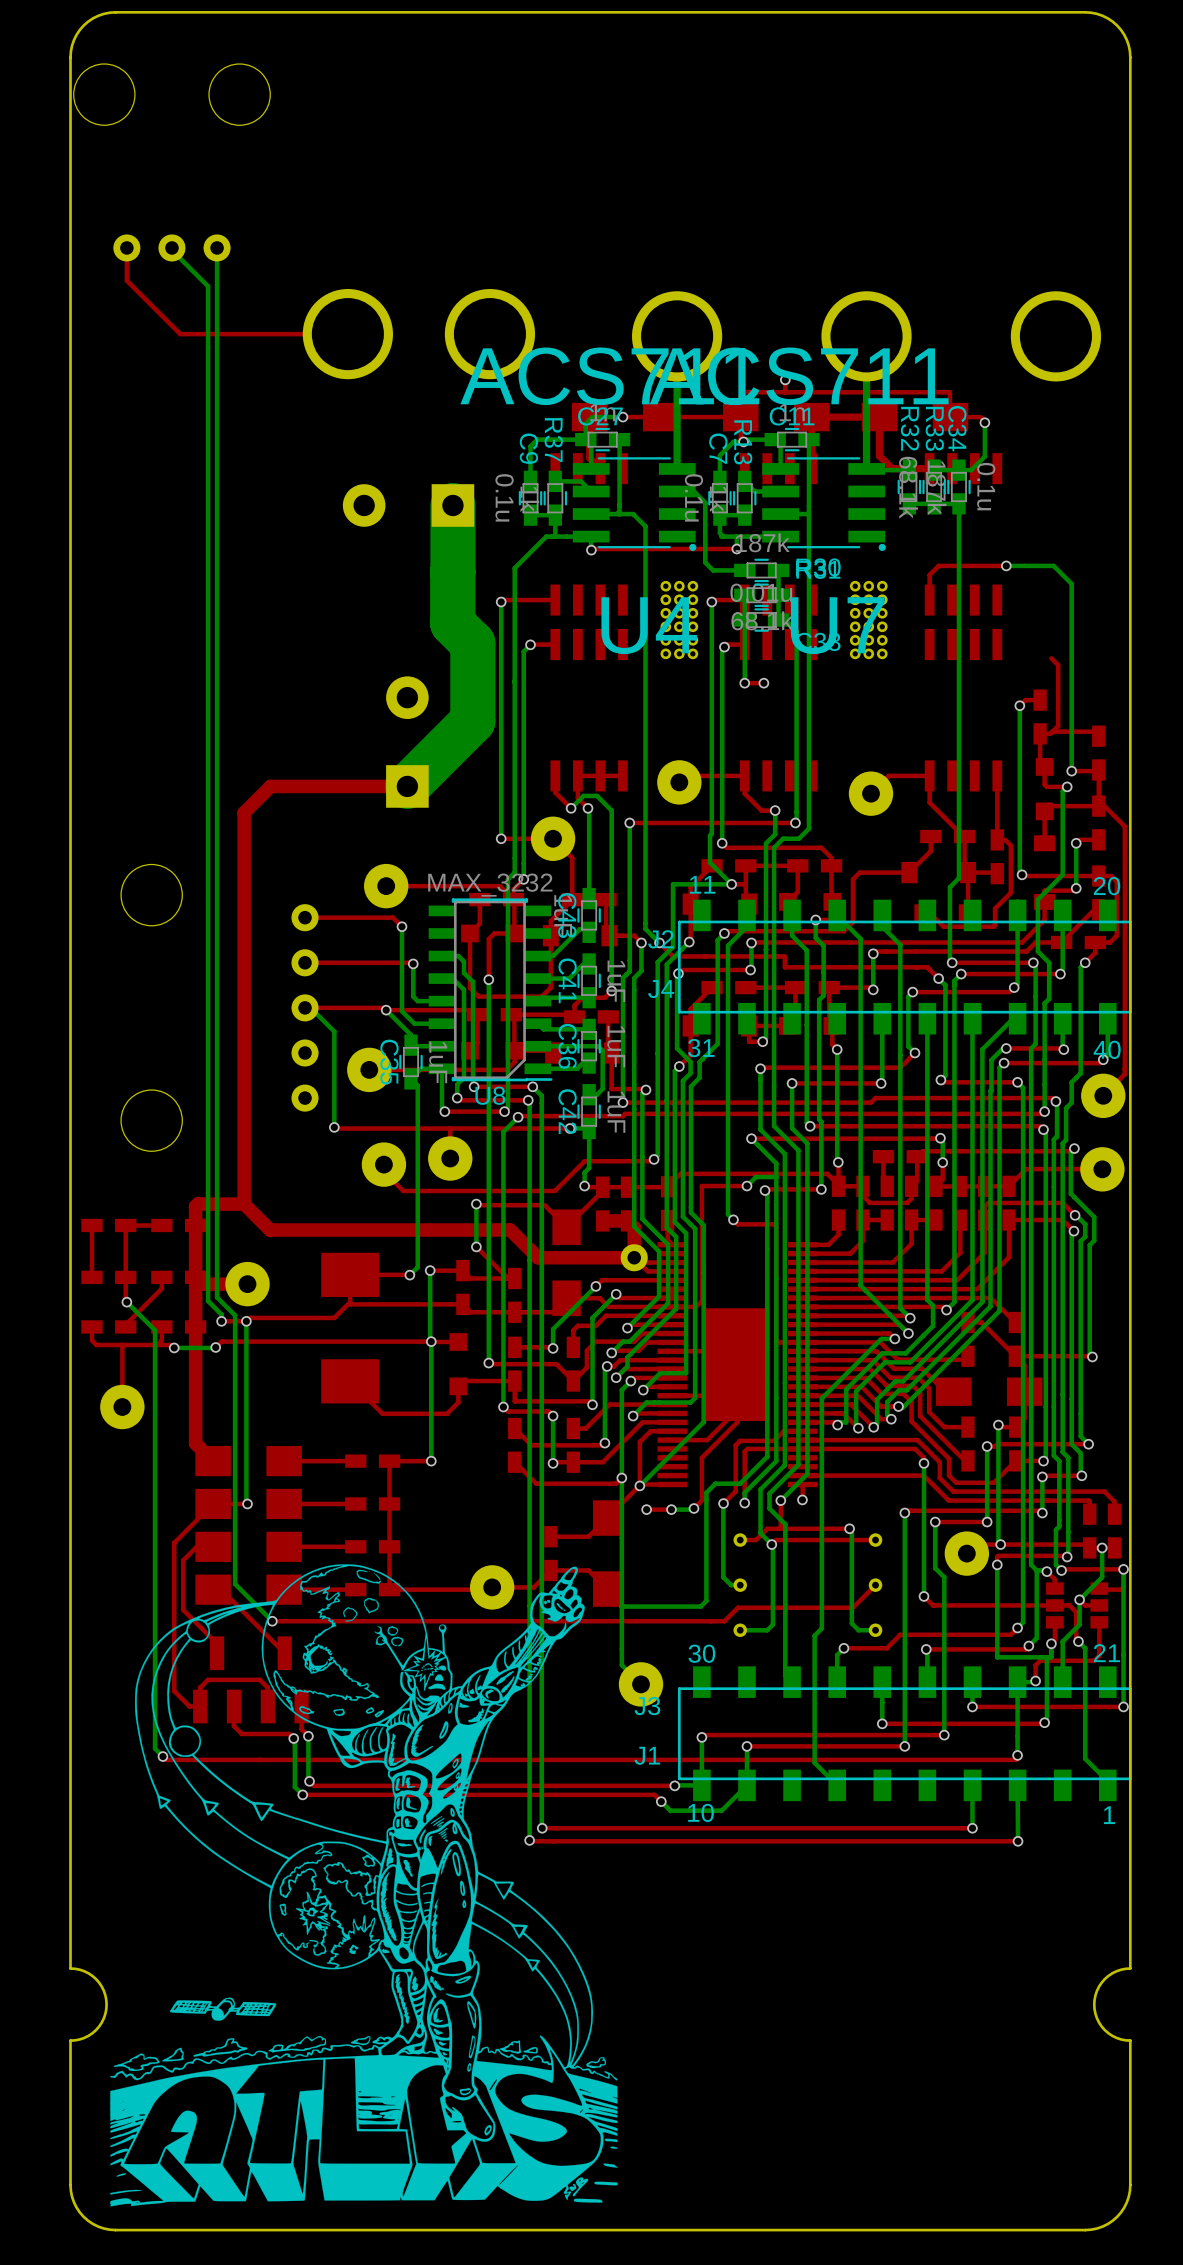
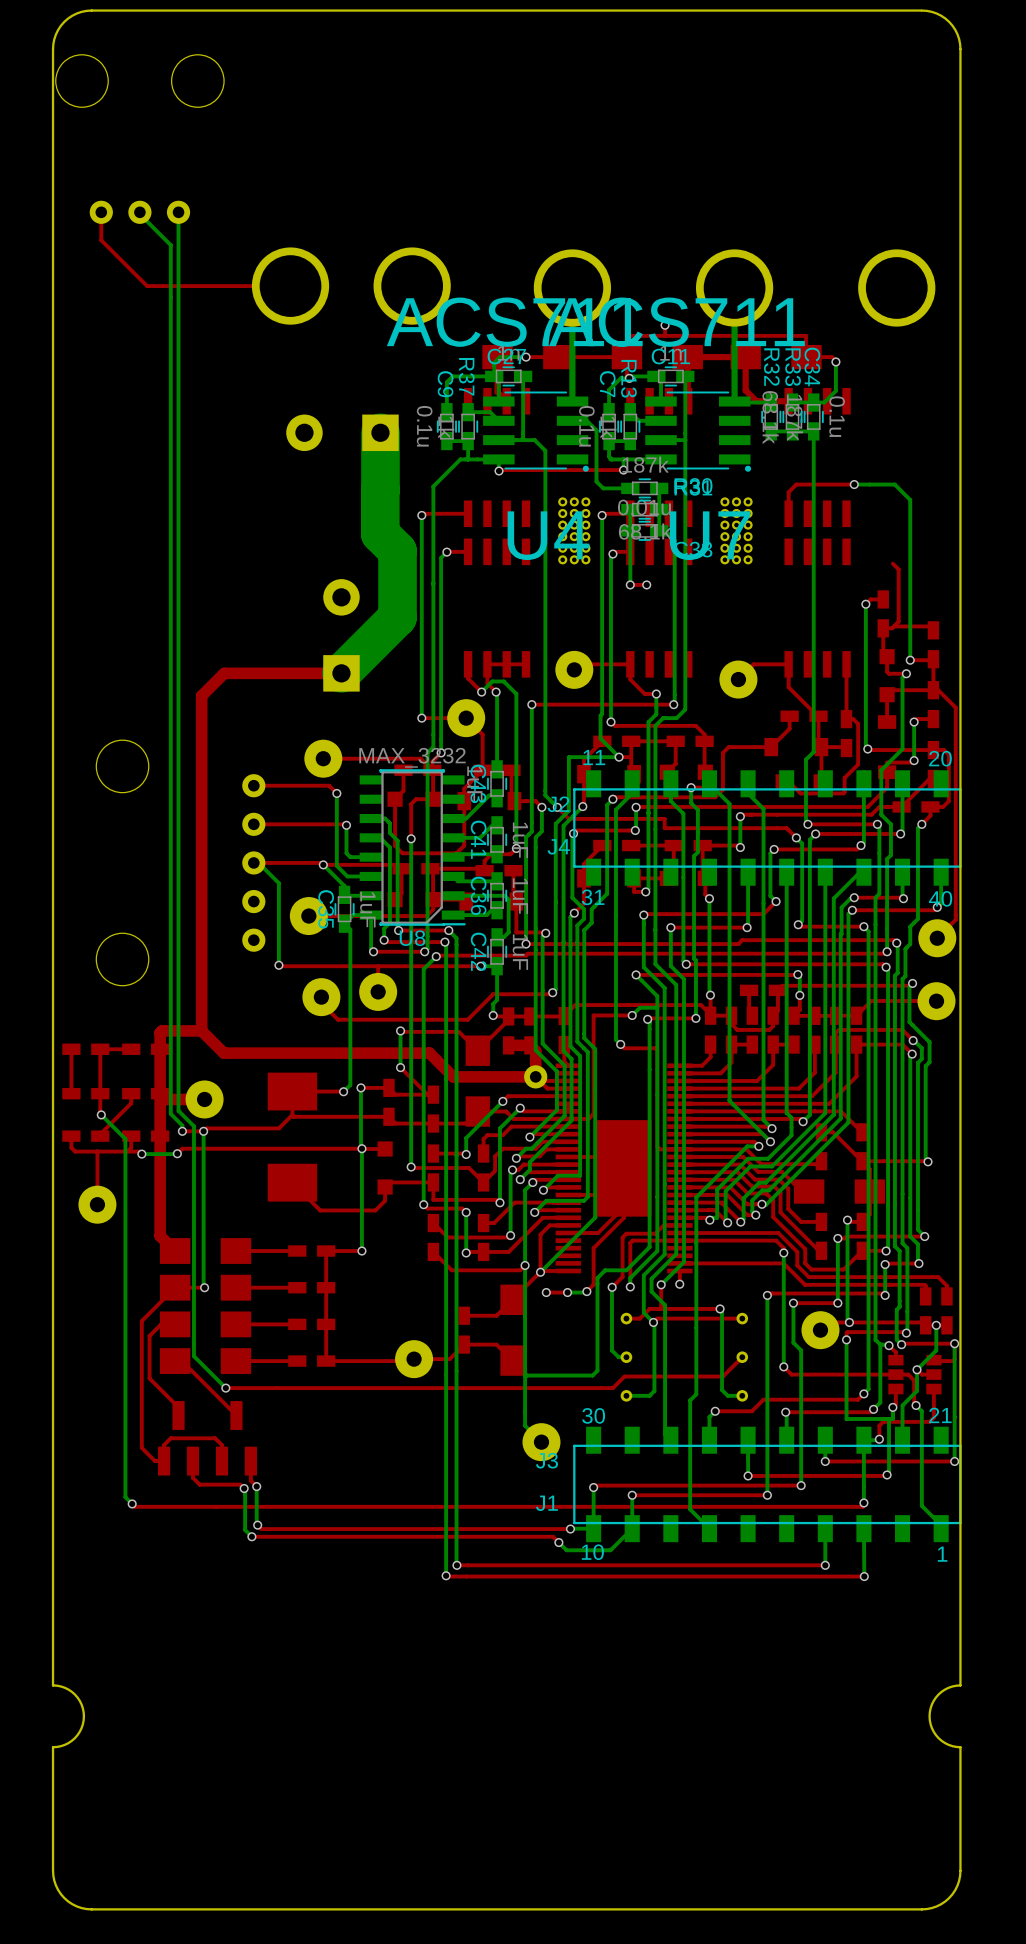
drawing: [110, 1564, 618, 2207] -> none

